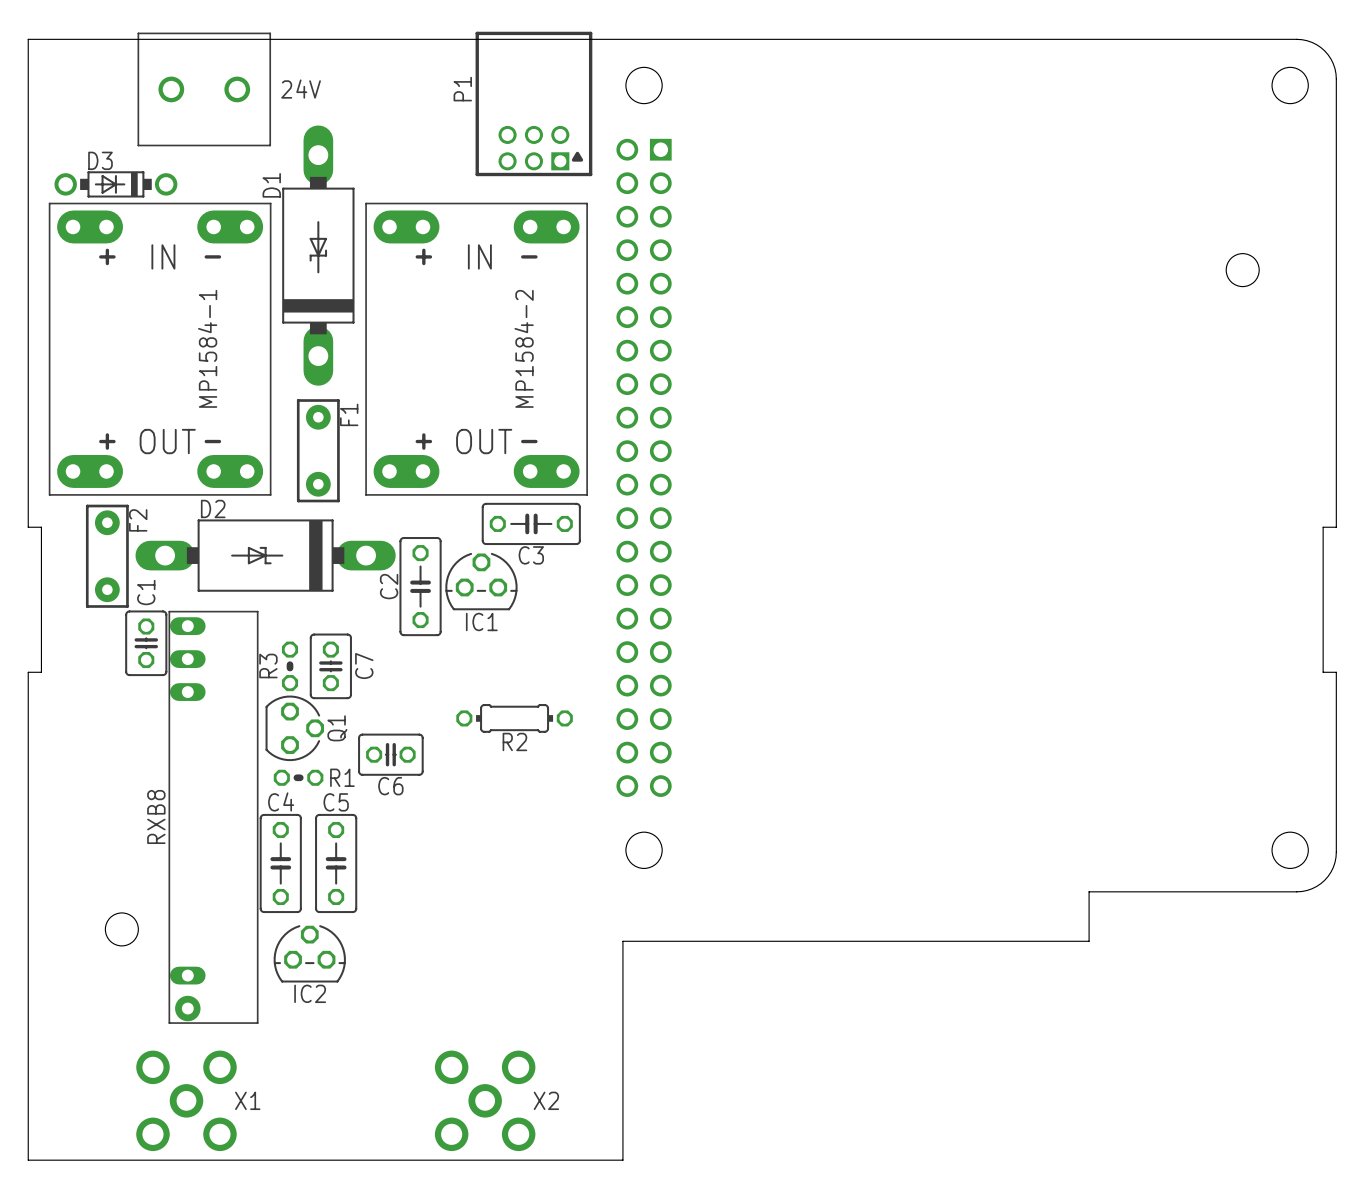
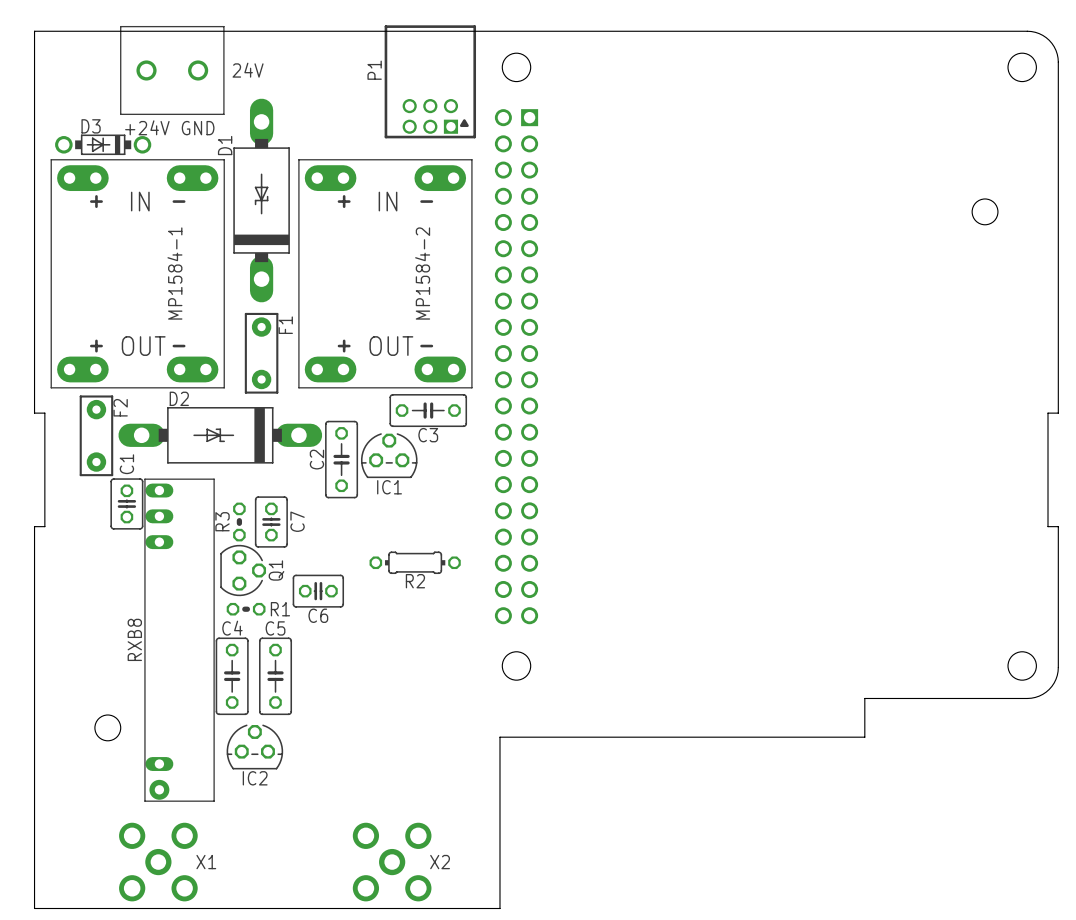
text: none -> +24V (147, 127)
text: none -> GND (198, 128)

